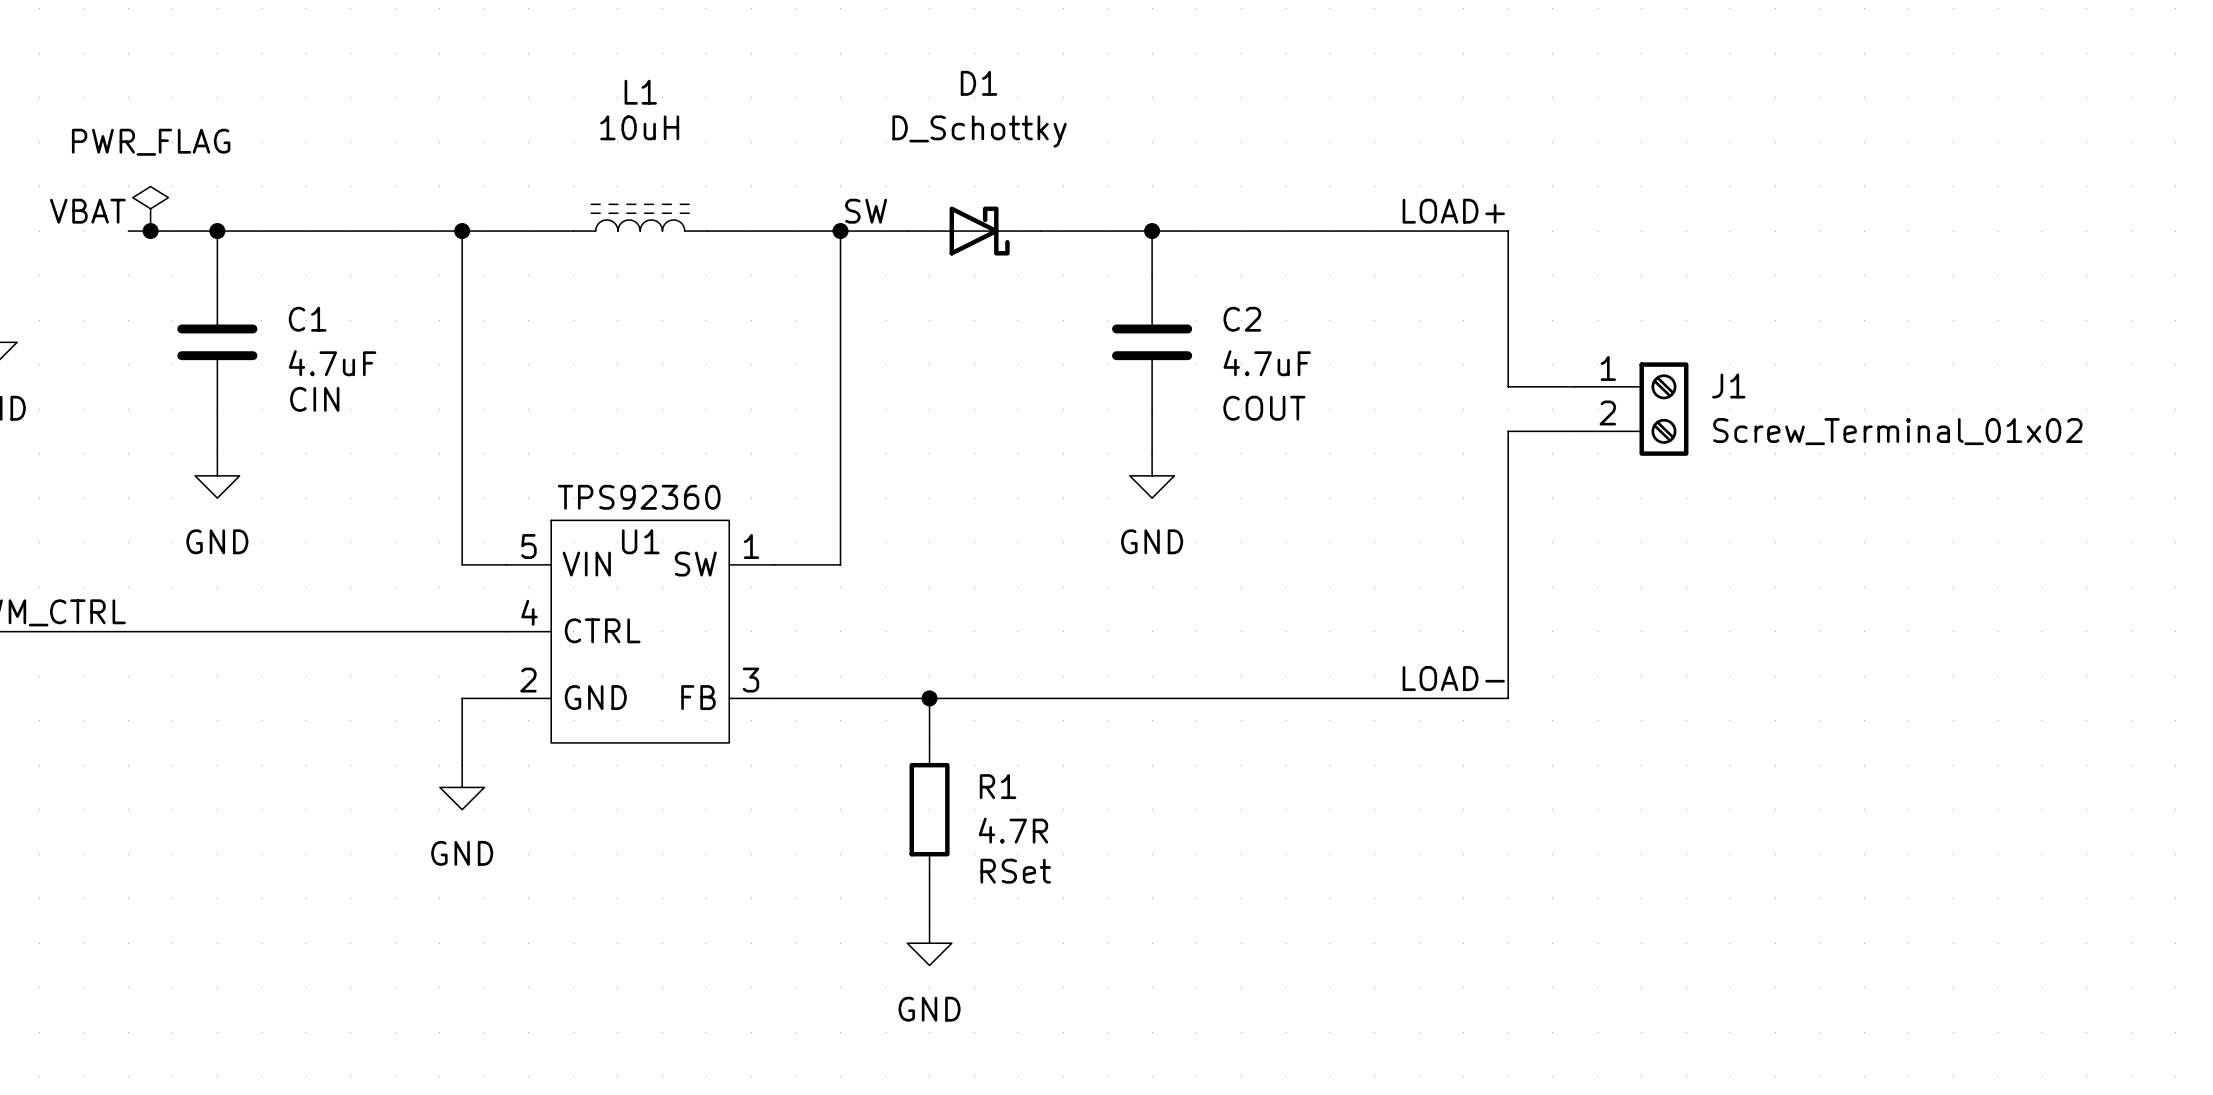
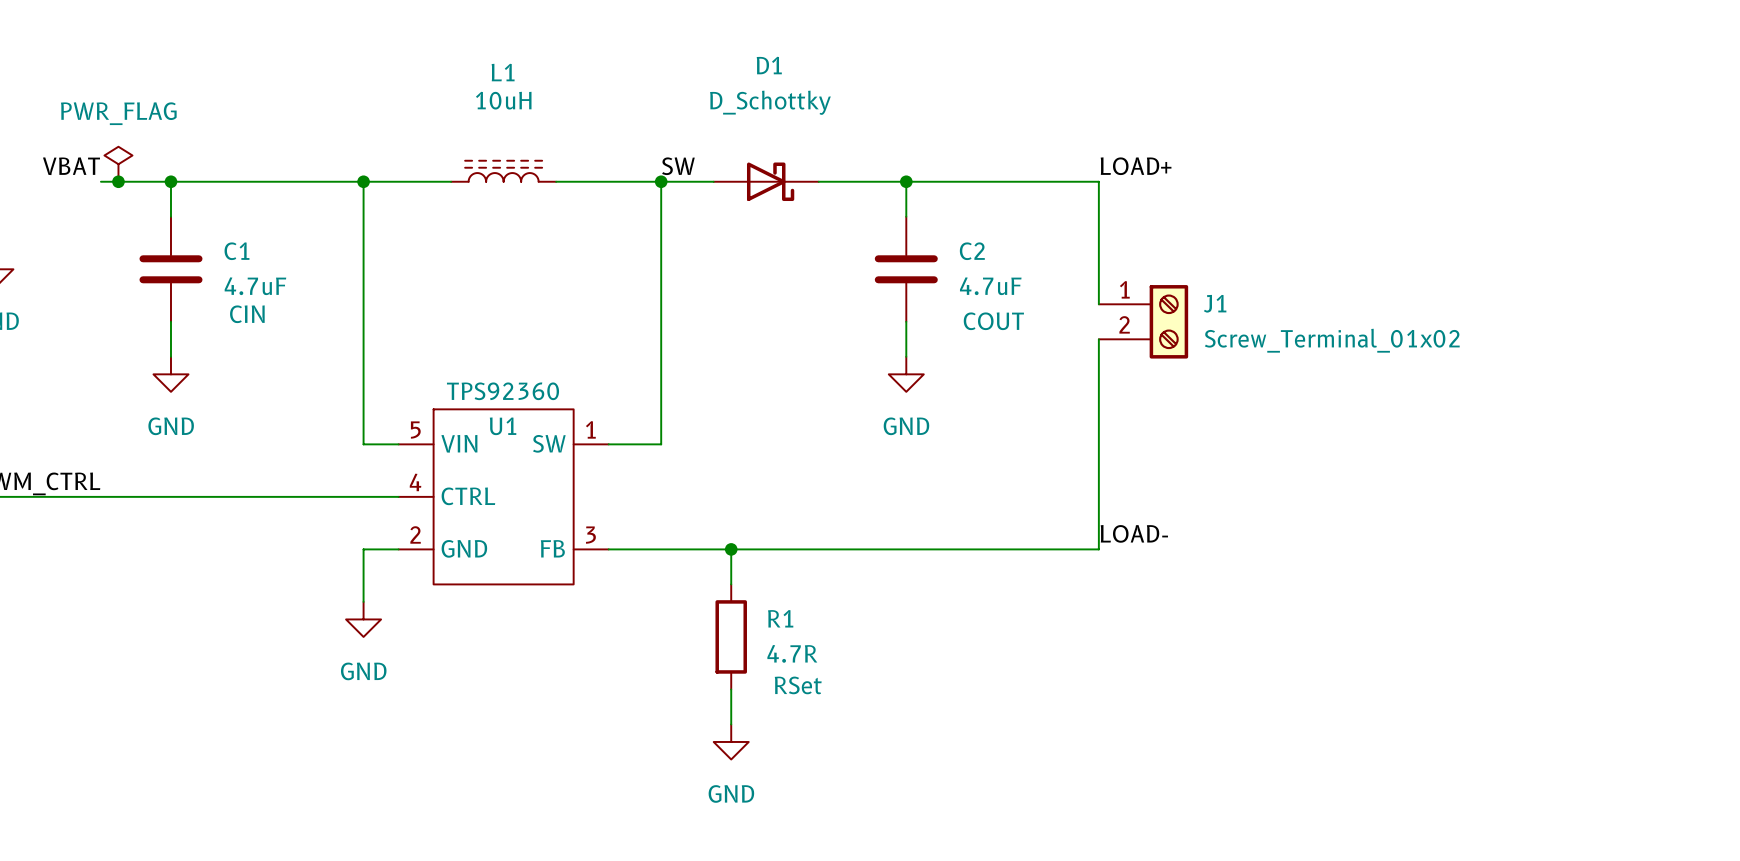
wire: (1396, 231) (1508, 231) (1508, 386) (1574, 386) -> (1098, 181) (1098, 304)
J1 position: (1631, 409) -> (1143, 321)
wire: (1574, 431) (1508, 431) (1508, 698) (1396, 698) -> (1098, 339) (1098, 549)

